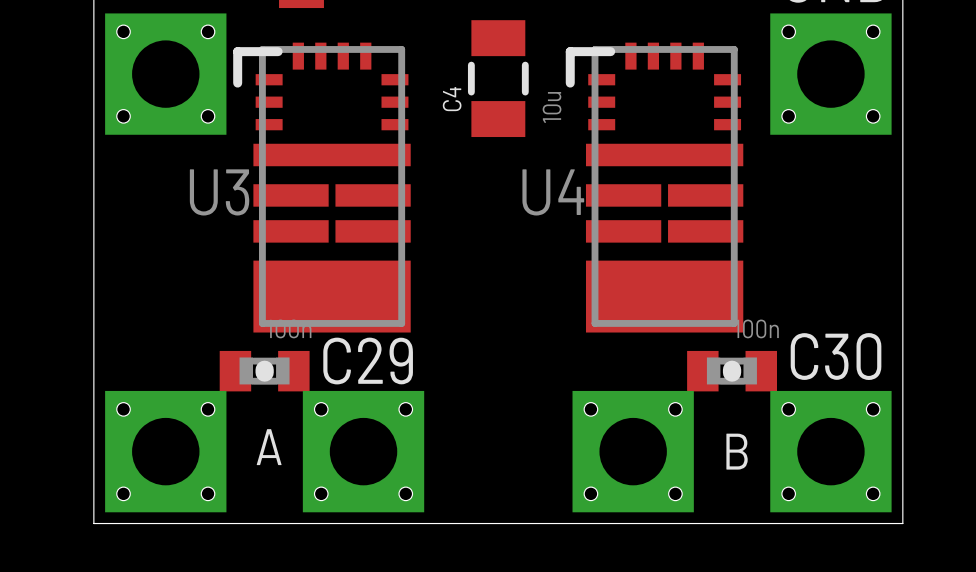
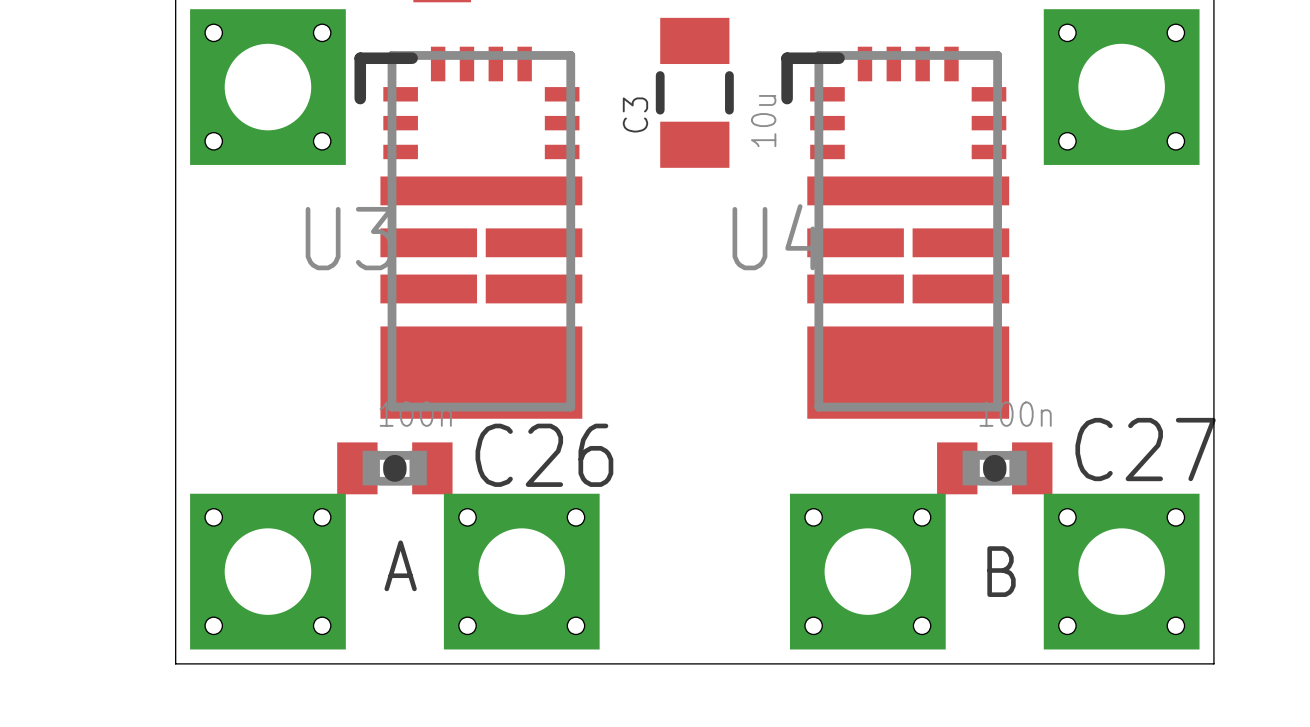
C4 name: C4 (452, 99) -> C3 (635, 114)
C30 name: C30 (836, 356) -> C27 (1145, 449)
C29 name: C29 (368, 361) -> C26 (544, 455)

